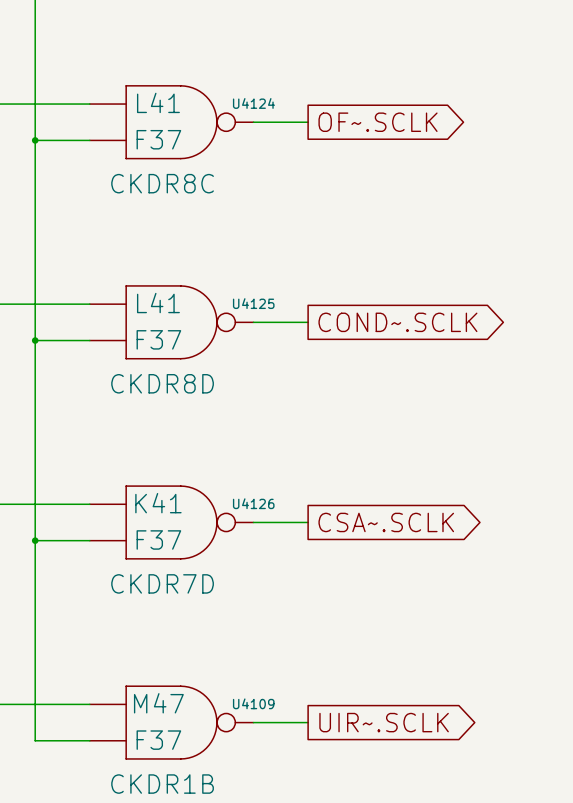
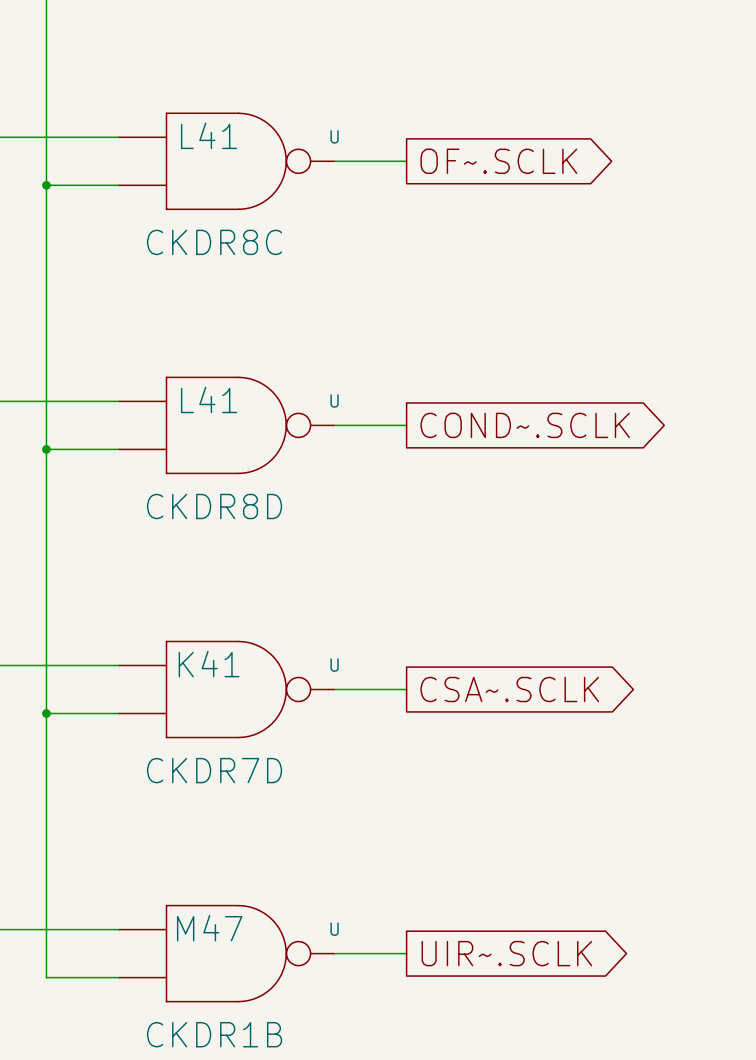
U4124 name: U4124 (253, 103) -> U (334, 136)
U4124 value: F37 (158, 139) -> none
U4125 name: U4125 (253, 303) -> U (334, 400)
U4125 value: F37 (158, 339) -> none
U4126 name: U4126 (253, 503) -> U (334, 665)
U4126 value: F37 (158, 539) -> none
U4109 name: U4109 (253, 703) -> U (334, 929)
U4109 value: F37 (158, 740) -> none

